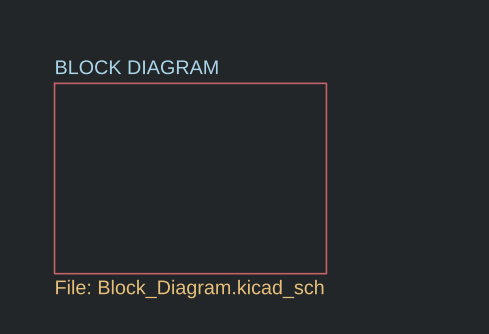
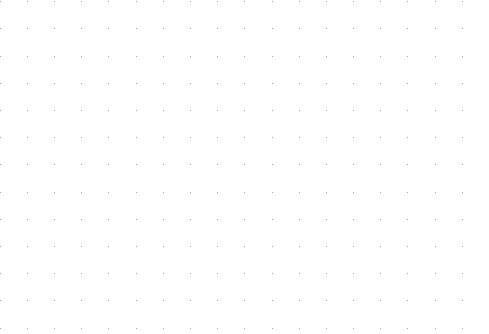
sheet BLOCK DIAGRAM: File: Block_Diagram.kicad_sch (190, 178) -> none

